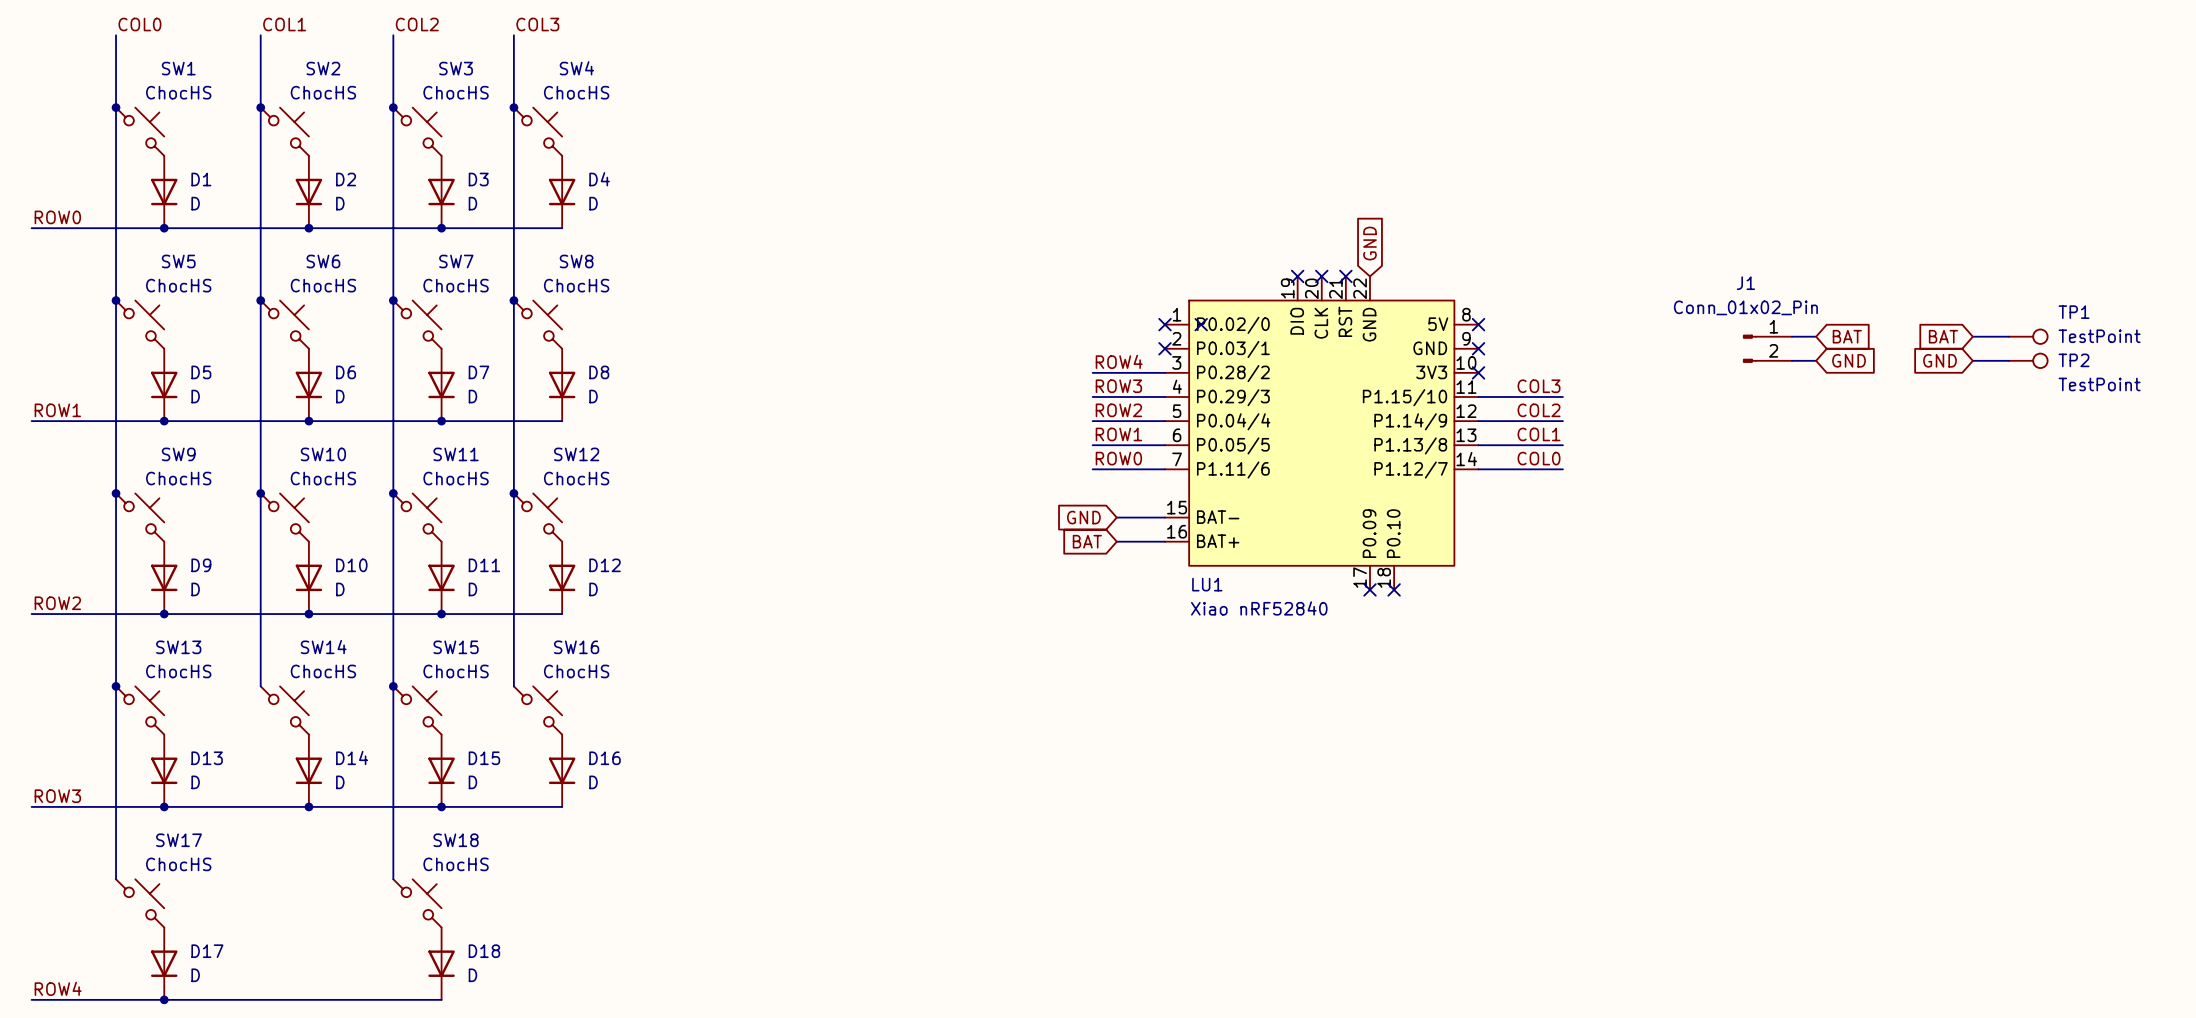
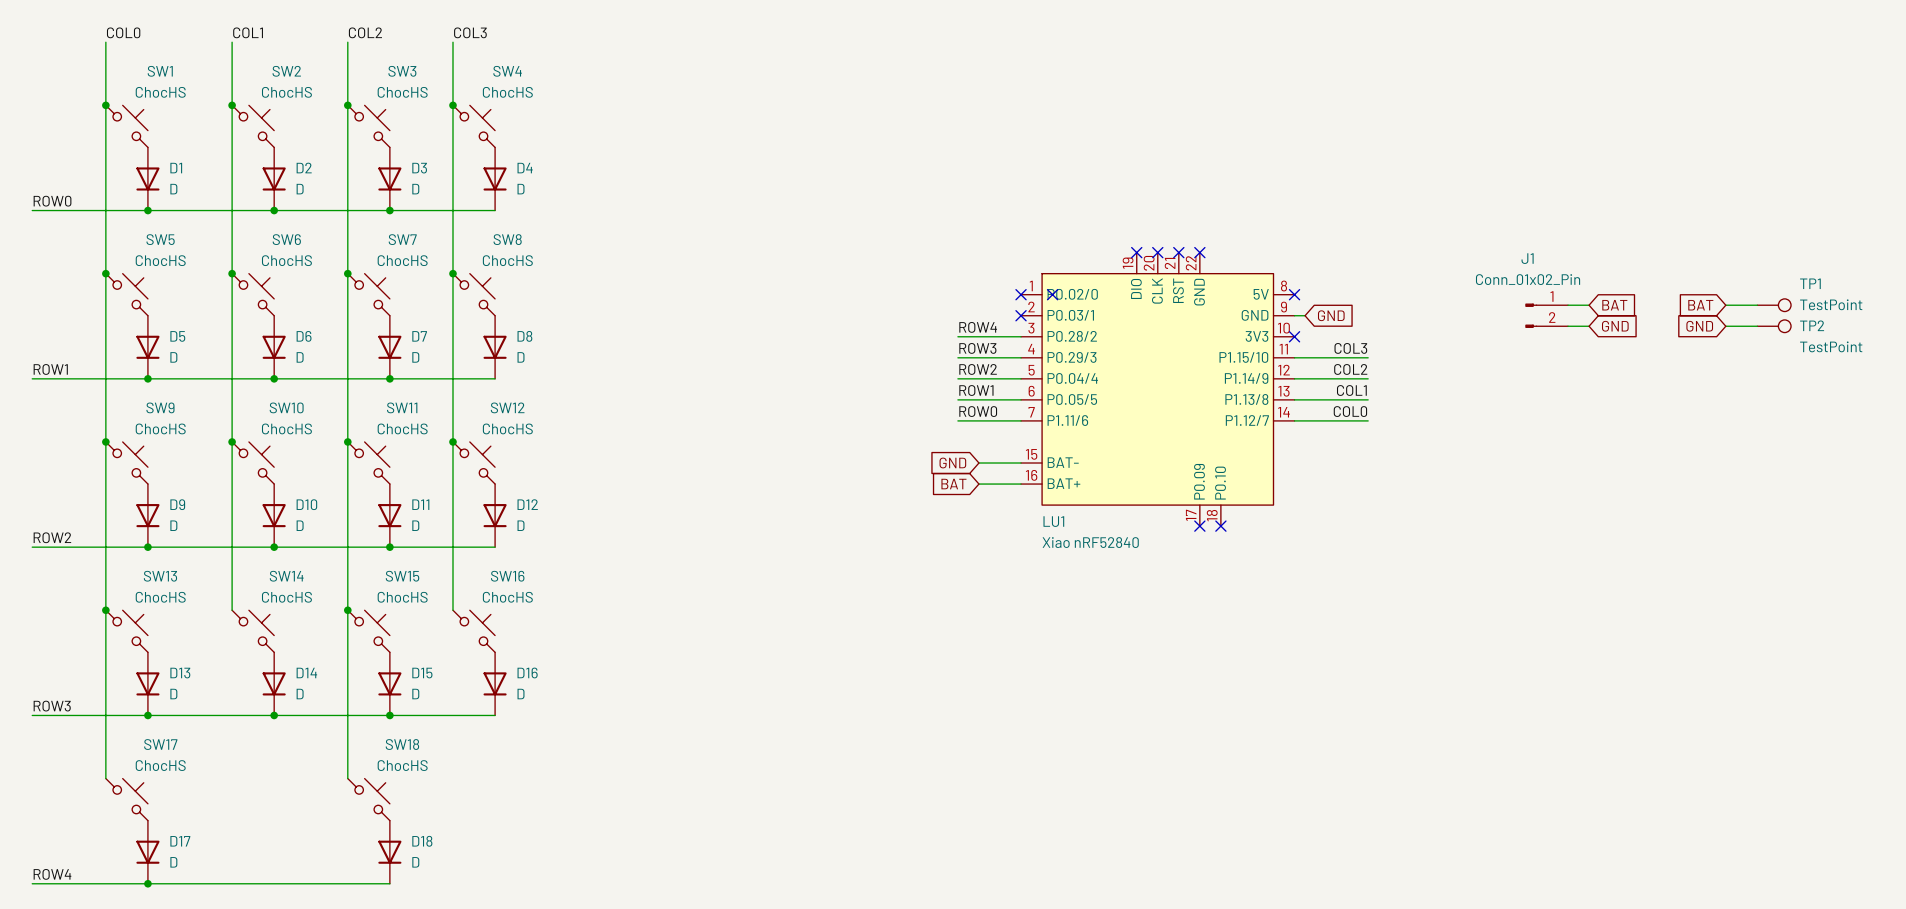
global label rotation: 0° (1370, 243) -> 90° clockwise (1331, 315)
global label position: GND (1370, 243) -> GND (1331, 315)
no-connect mark: none -> (1199, 252)
wire: none -> (1294, 315) (1305, 315)
no-connect mark: (1478, 348) -> none

